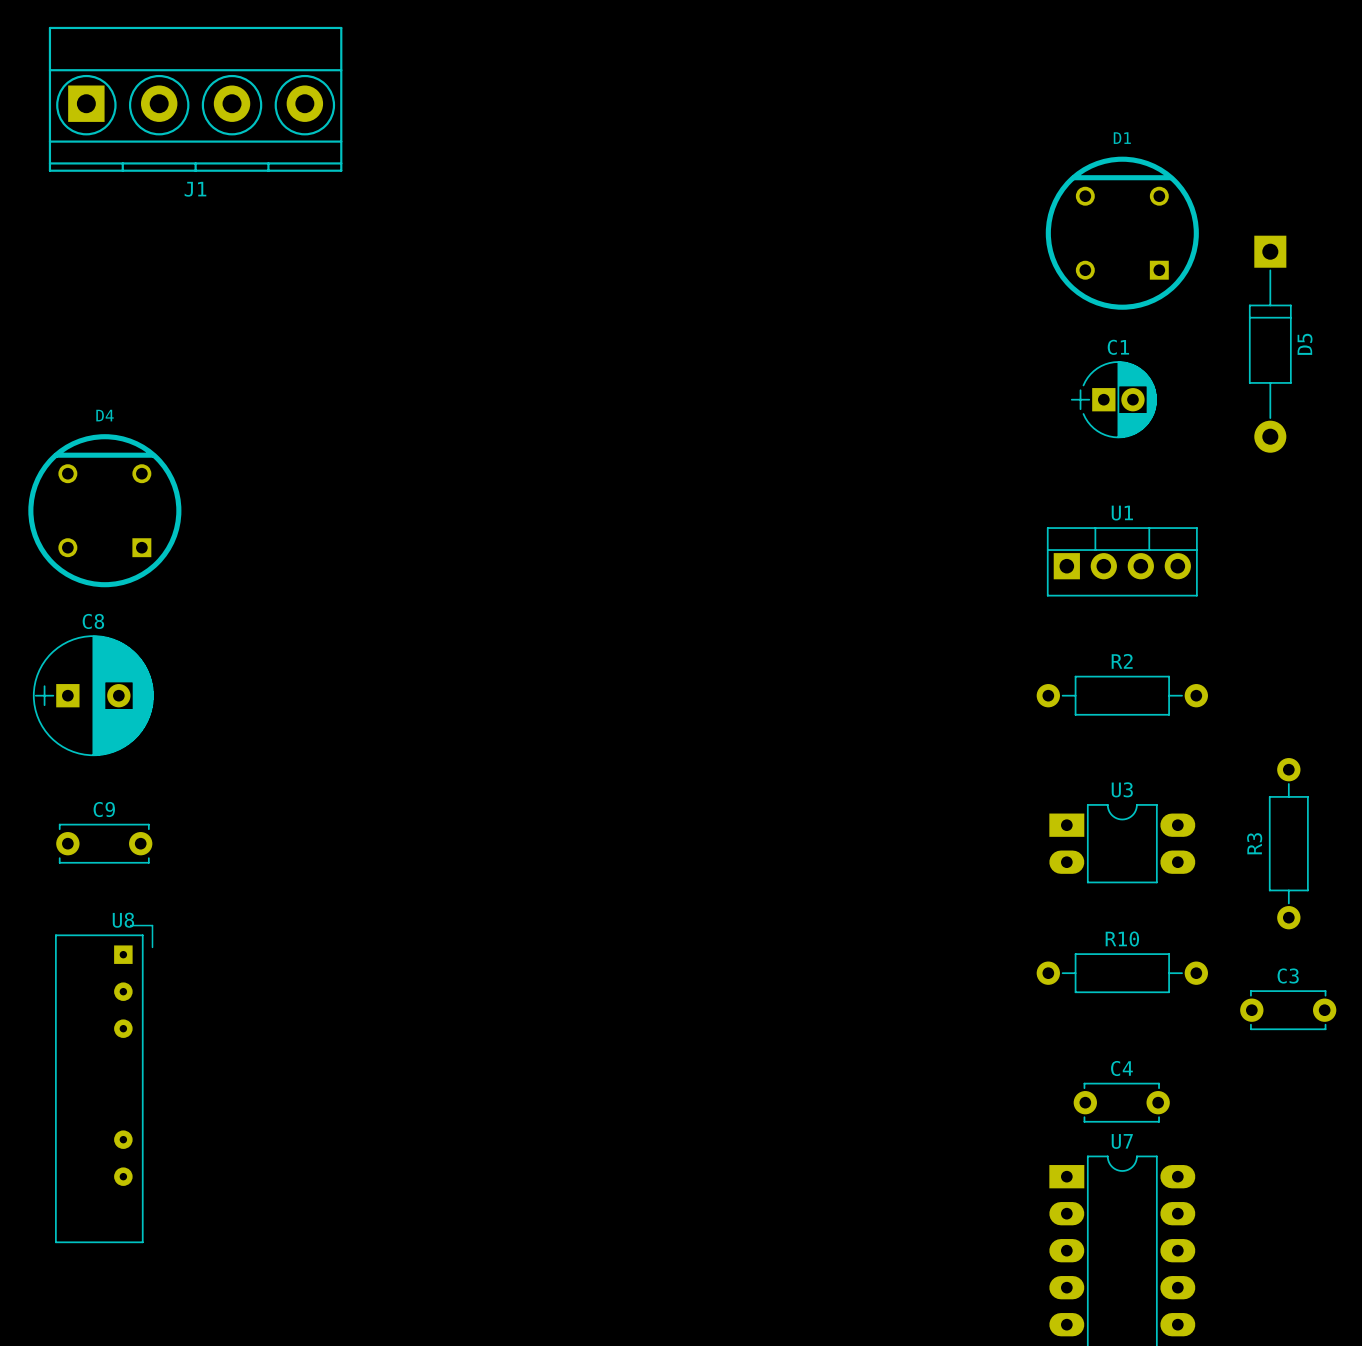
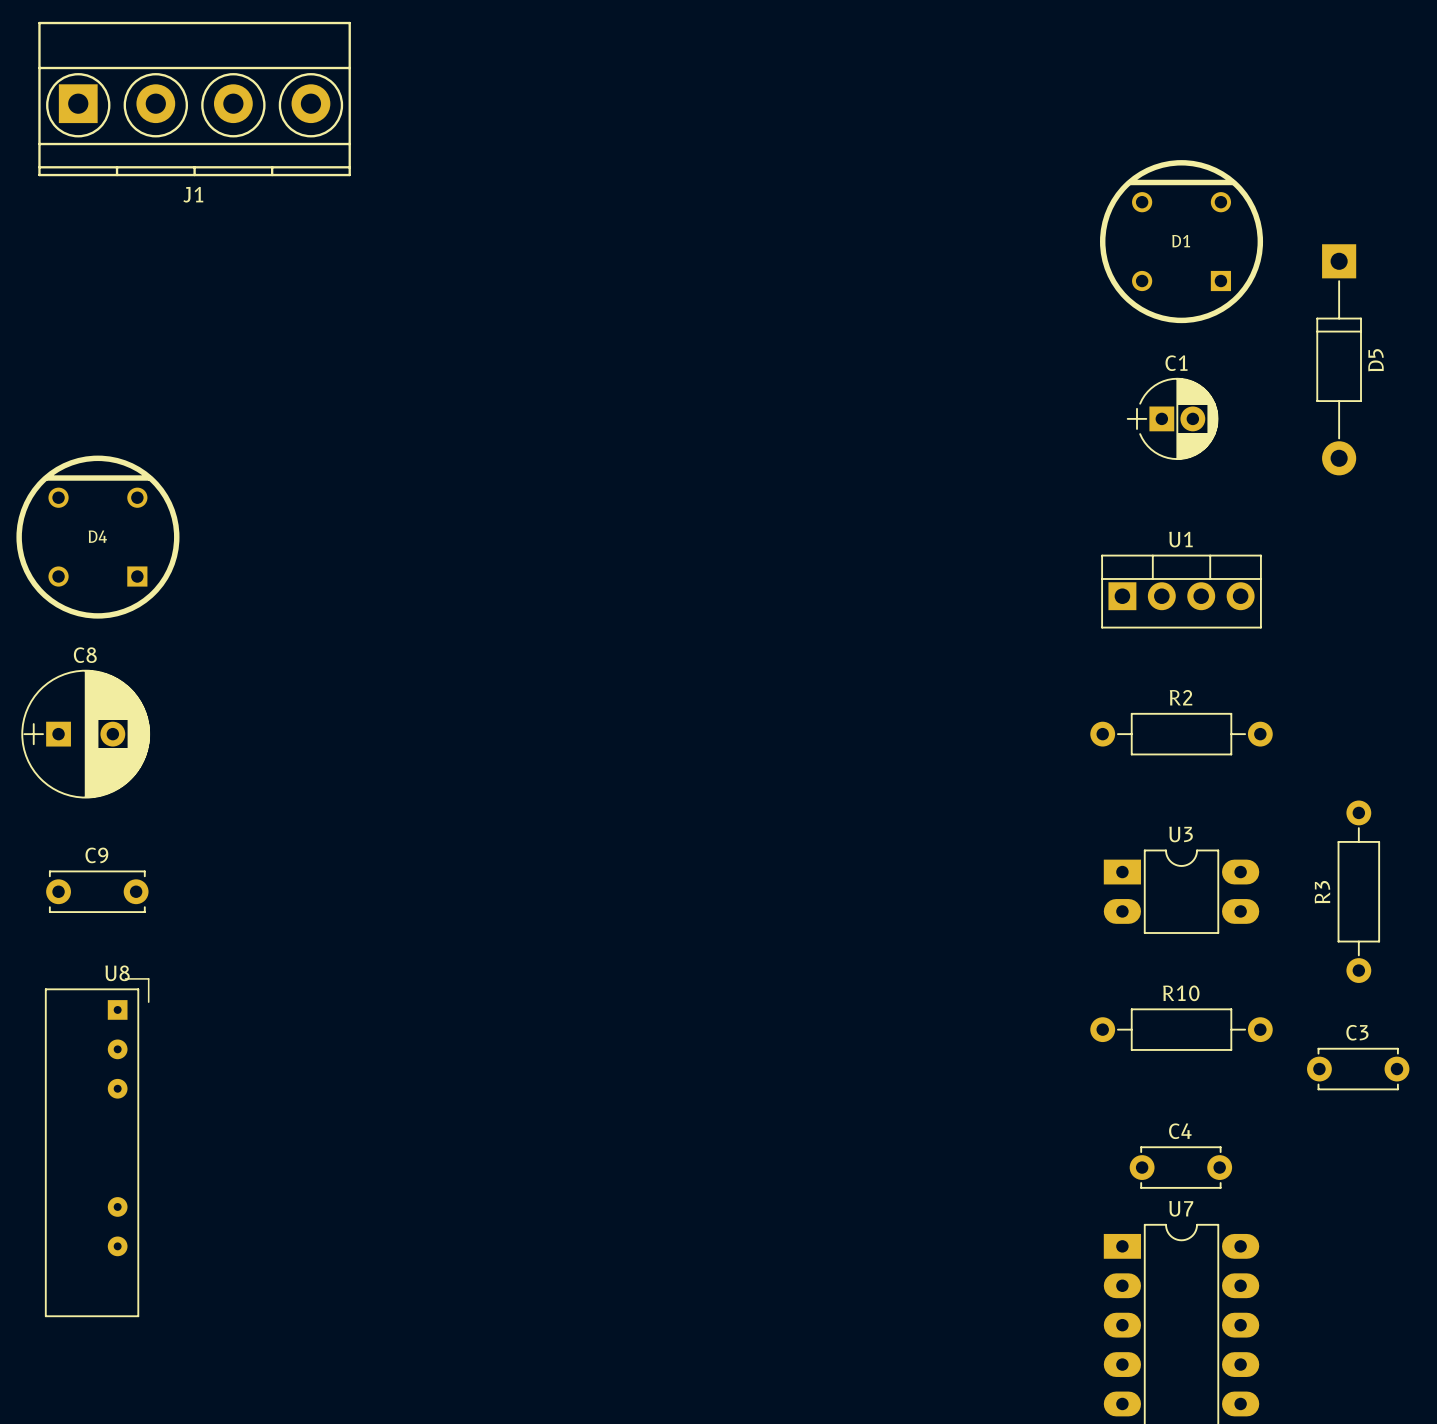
D1 name position: D1 (1122, 138) -> D1 (1181, 241)
D4 name position: D4 (105, 415) -> D4 (97, 536)

